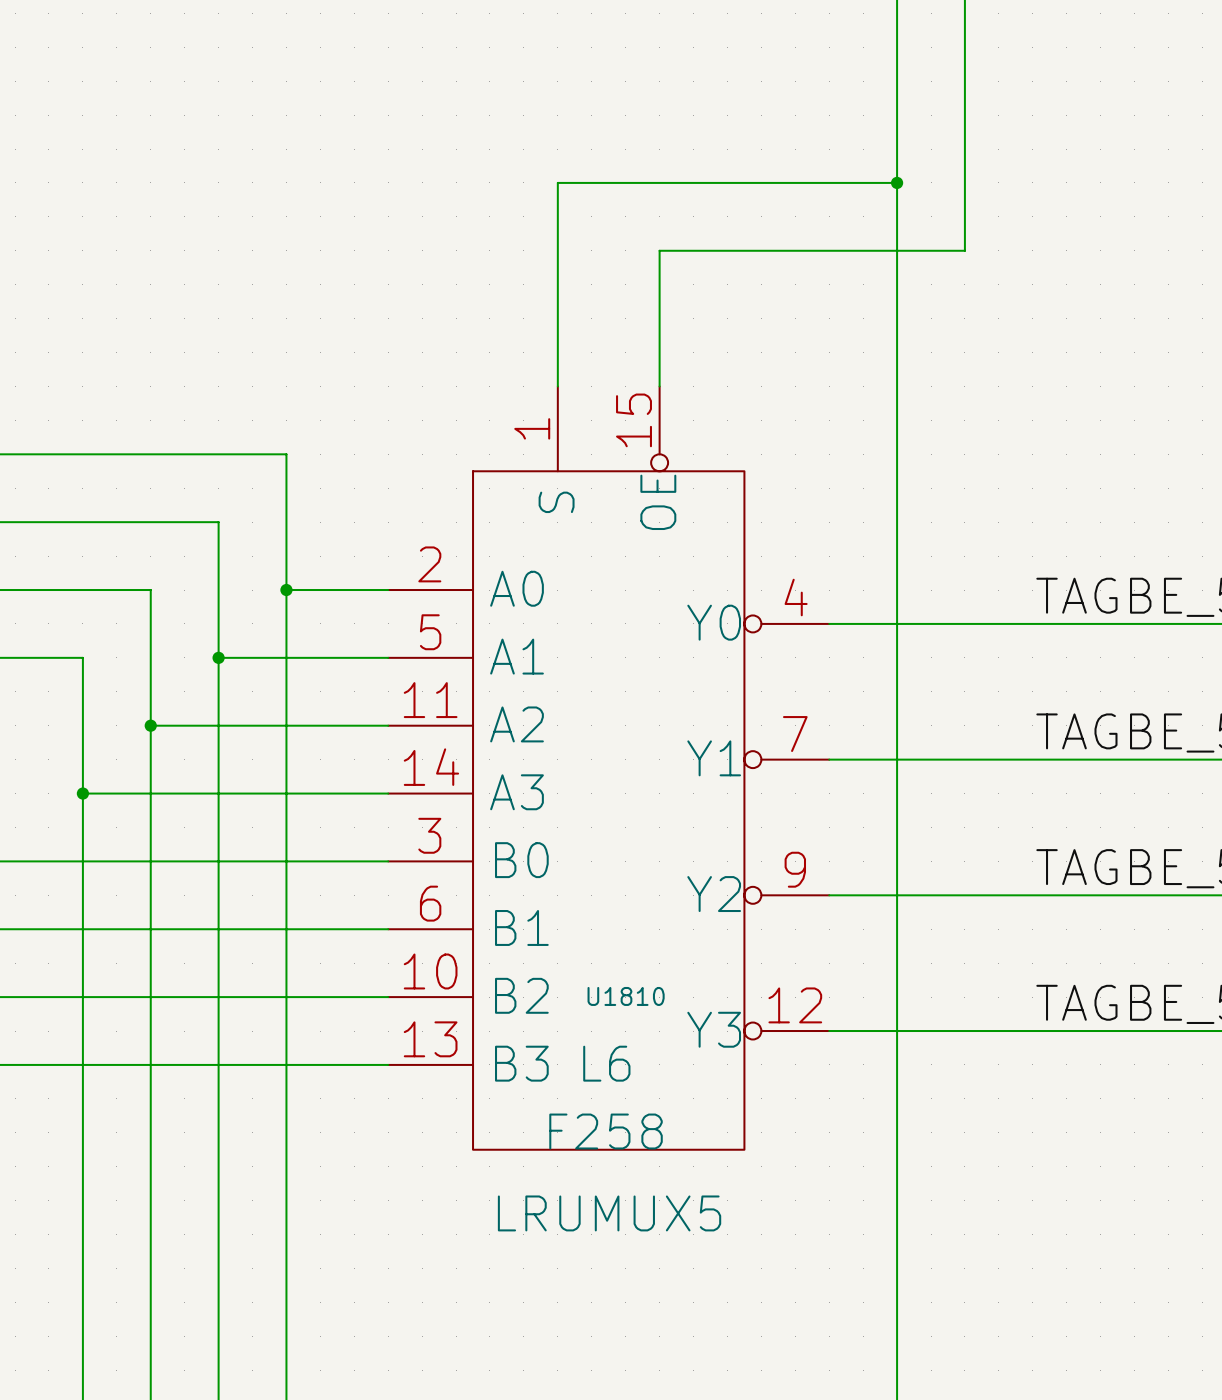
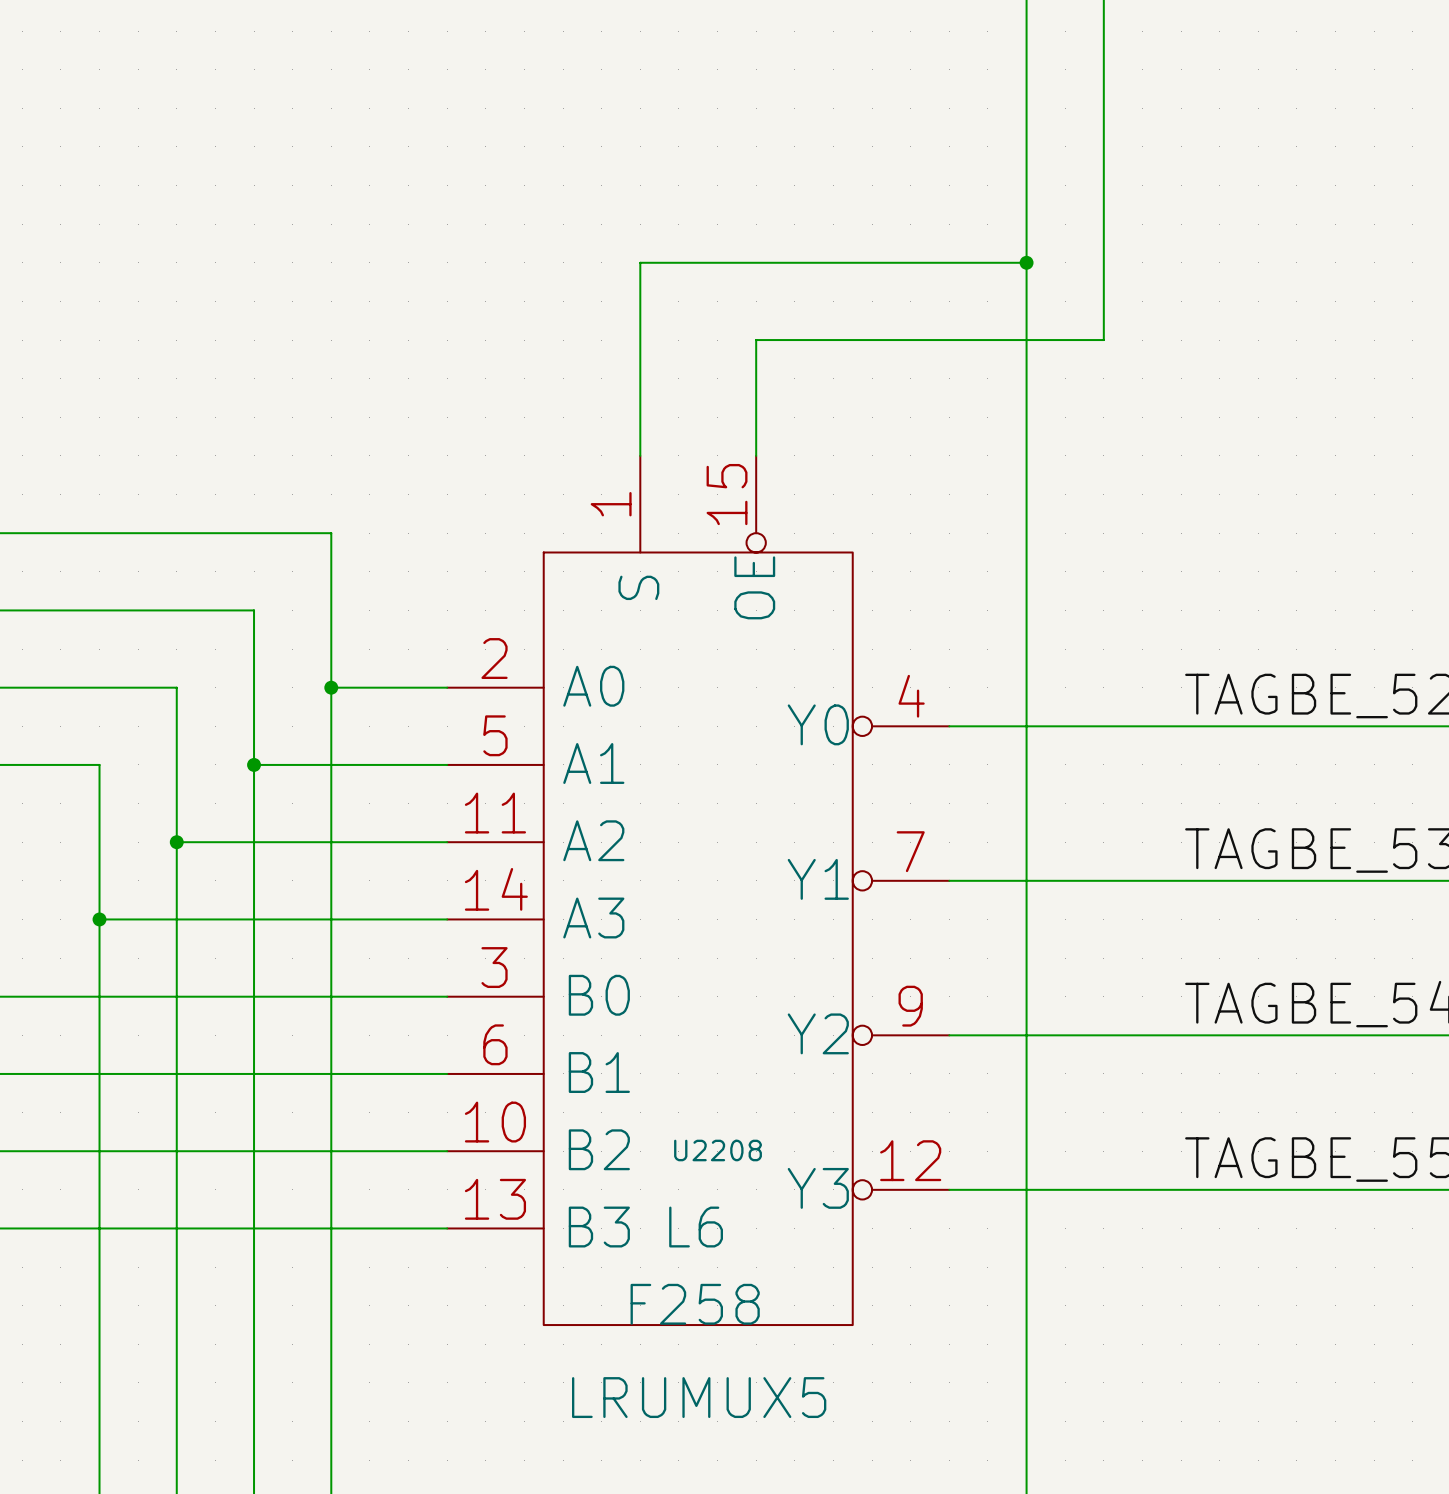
wire: (897, 182) (557, 182) (557, 216) -> (1026, 262) (640, 262)
junction position: (897, 182) -> (1026, 262)
wire: (964, 250) (659, 250) (659, 284) -> (1103, 301) (1103, 340) (756, 340)
U1810 name: U1810 (626, 996) -> U2208 (718, 1150)

